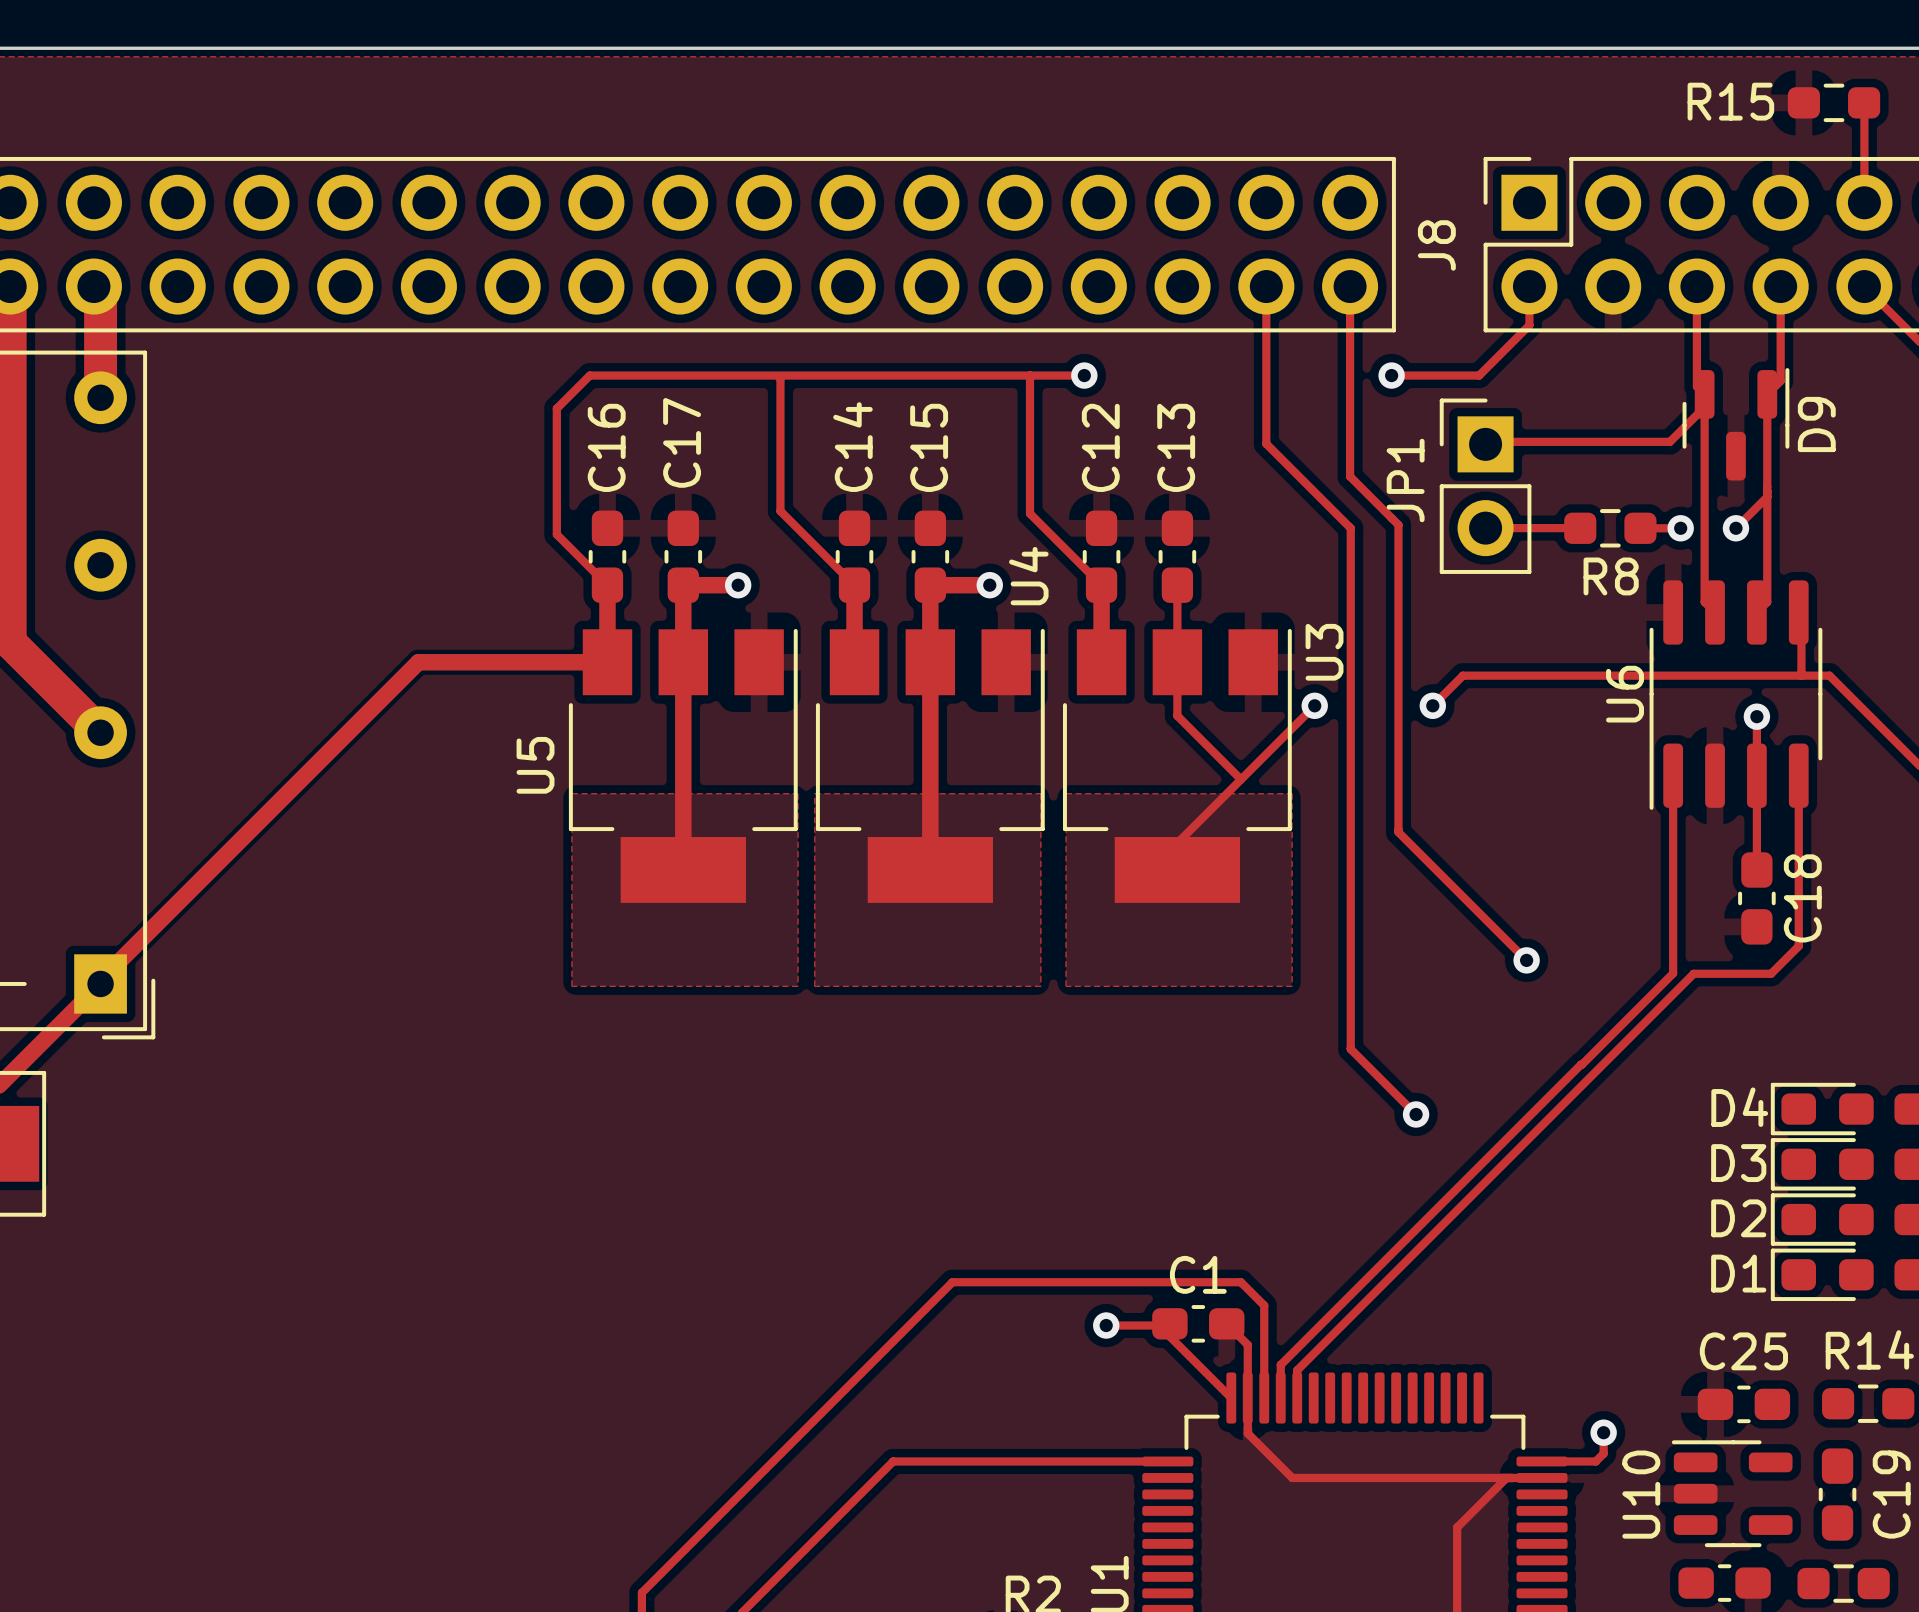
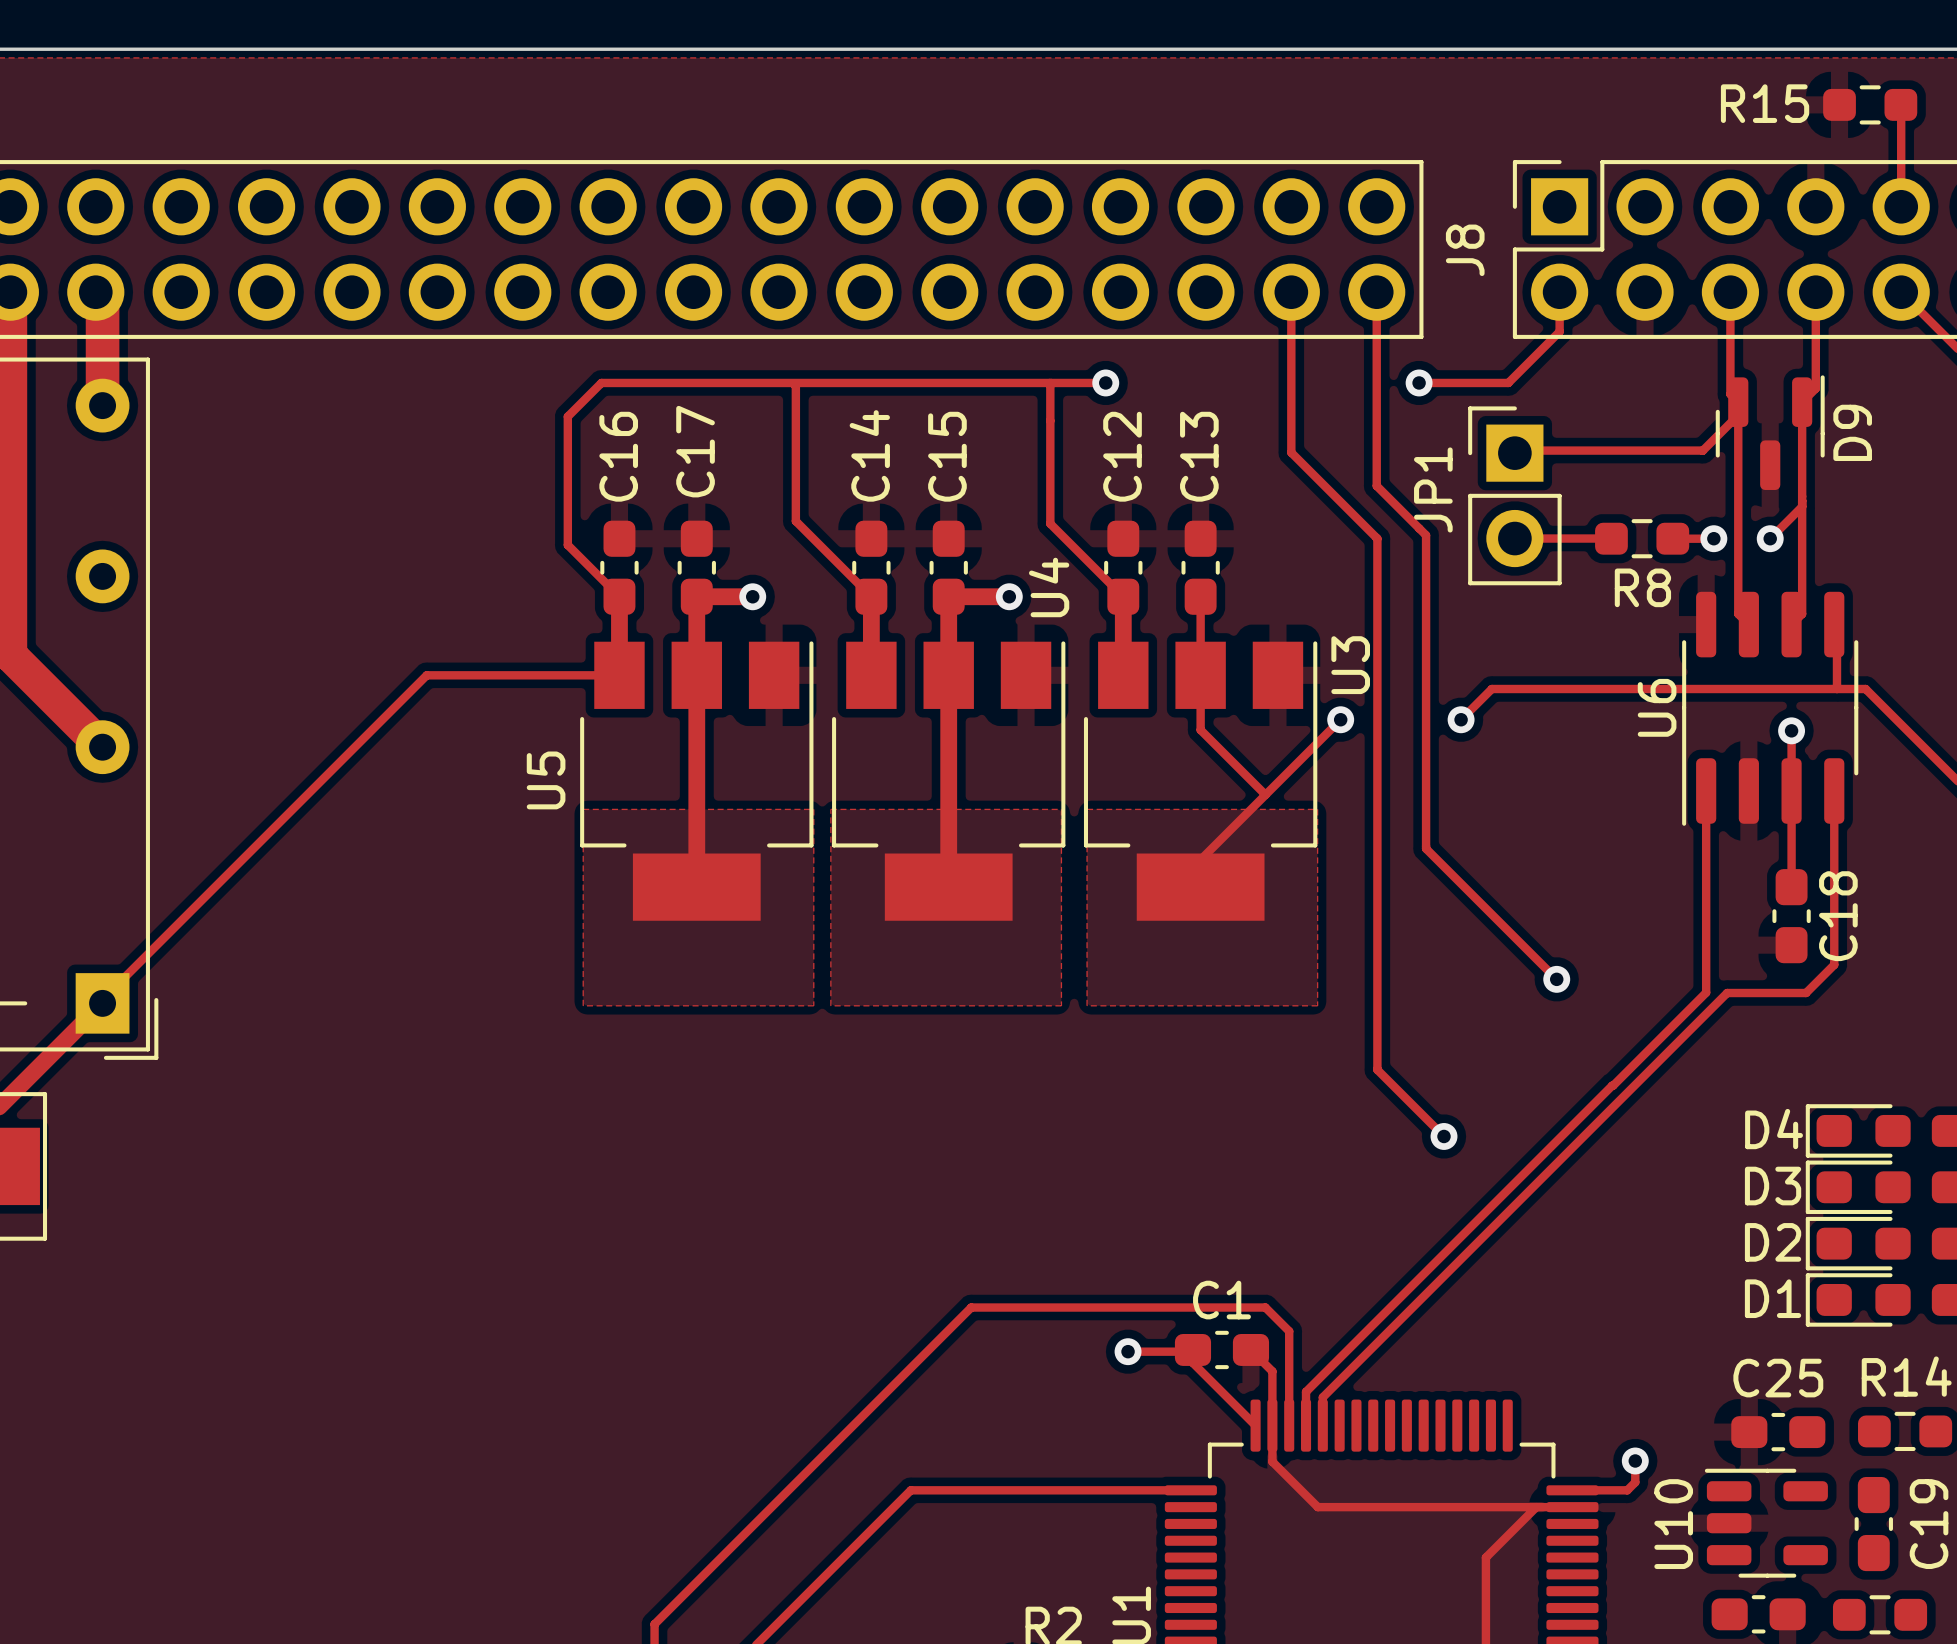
track width: thick (607, 662) (418, 662) (100, 980) (100, 983) -> thin (619, 675) (426, 675) (102, 999) (102, 1003)

